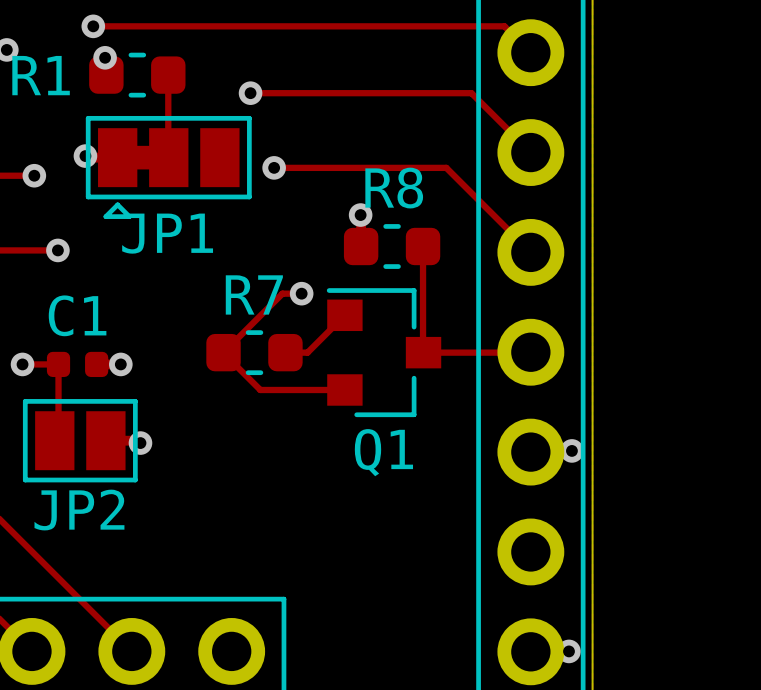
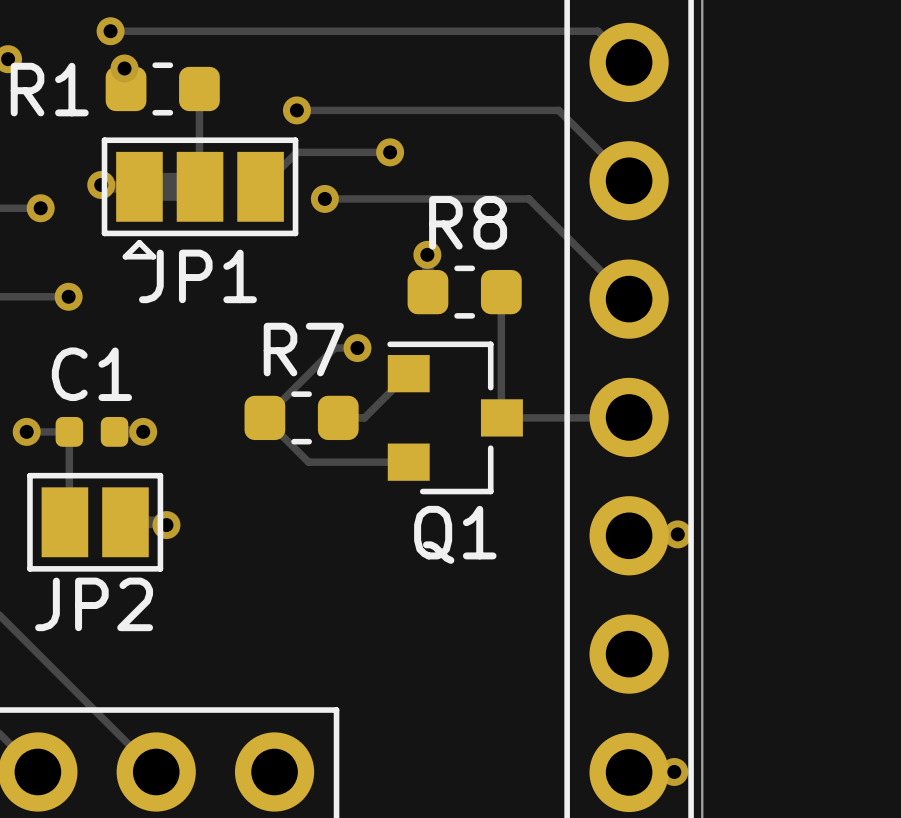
track: none -> (390, 152) (296, 152) (260, 186)
via: none -> (390, 152)

